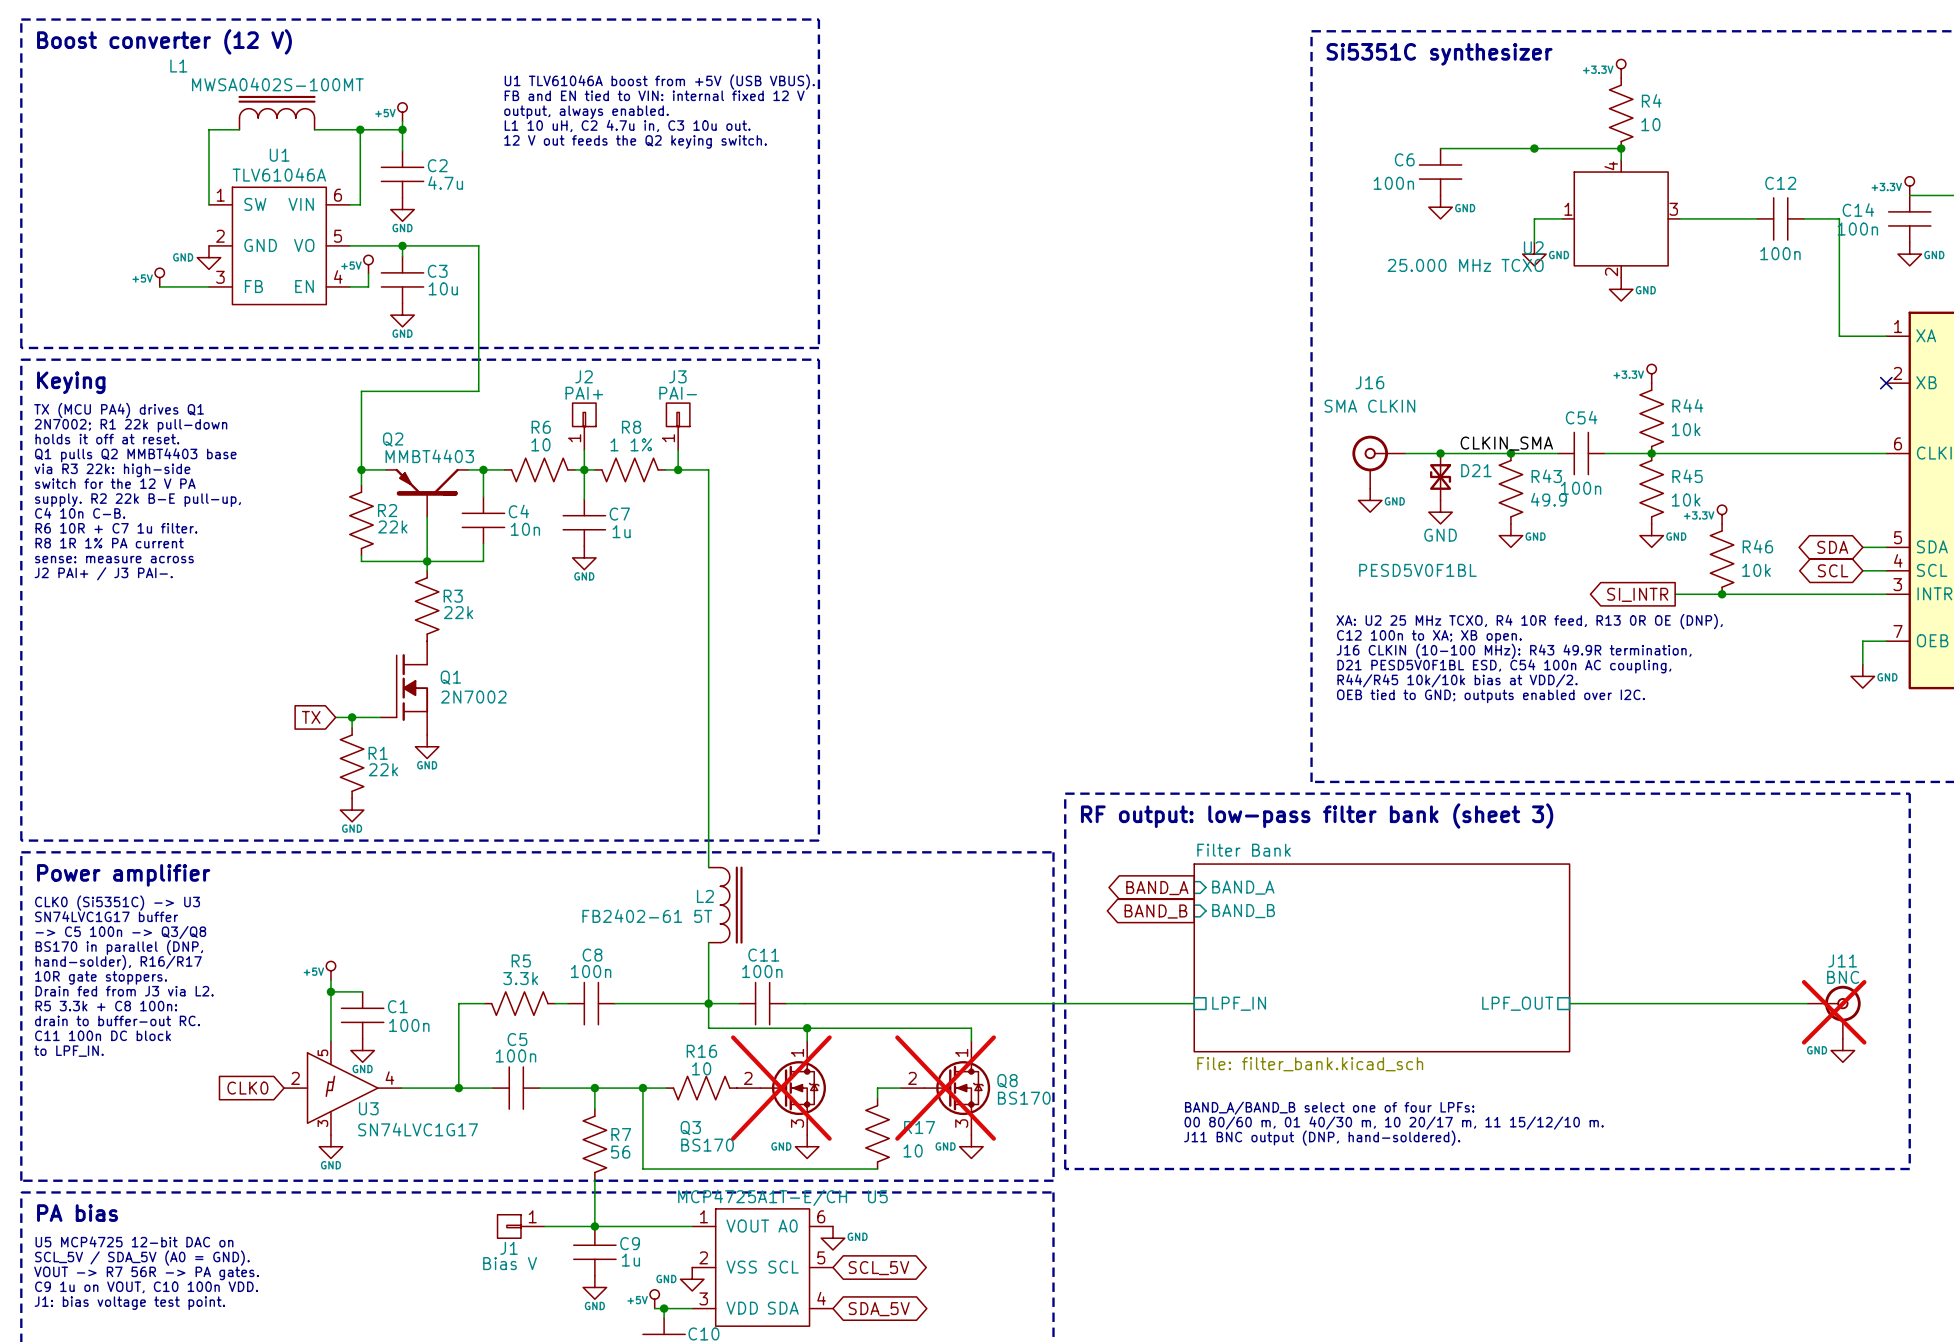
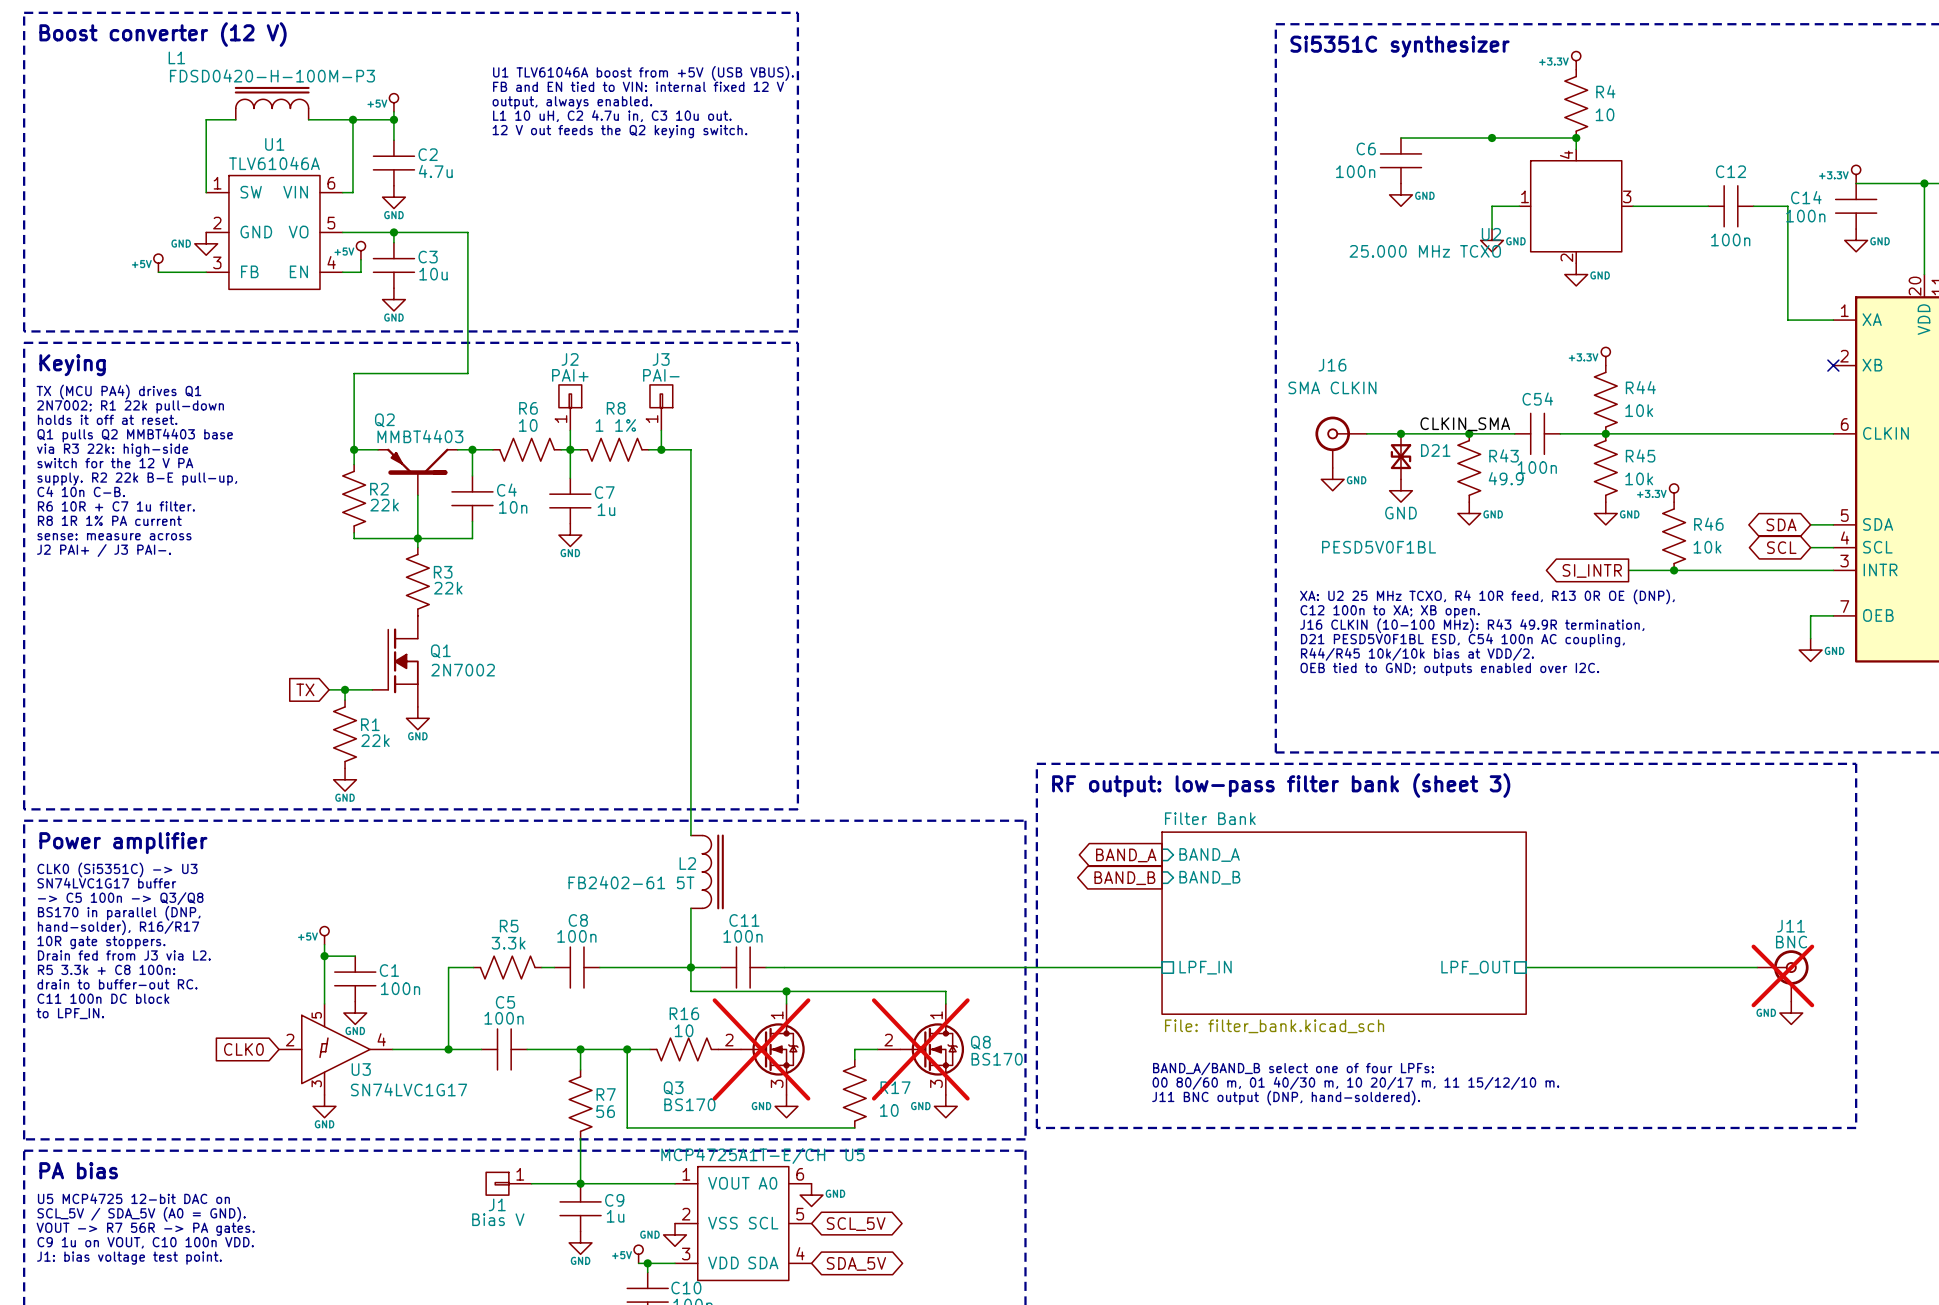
L1 value: MWSA0402S-100MT (277, 84) -> FDSD0420-H-100M-P3 (272, 75)

